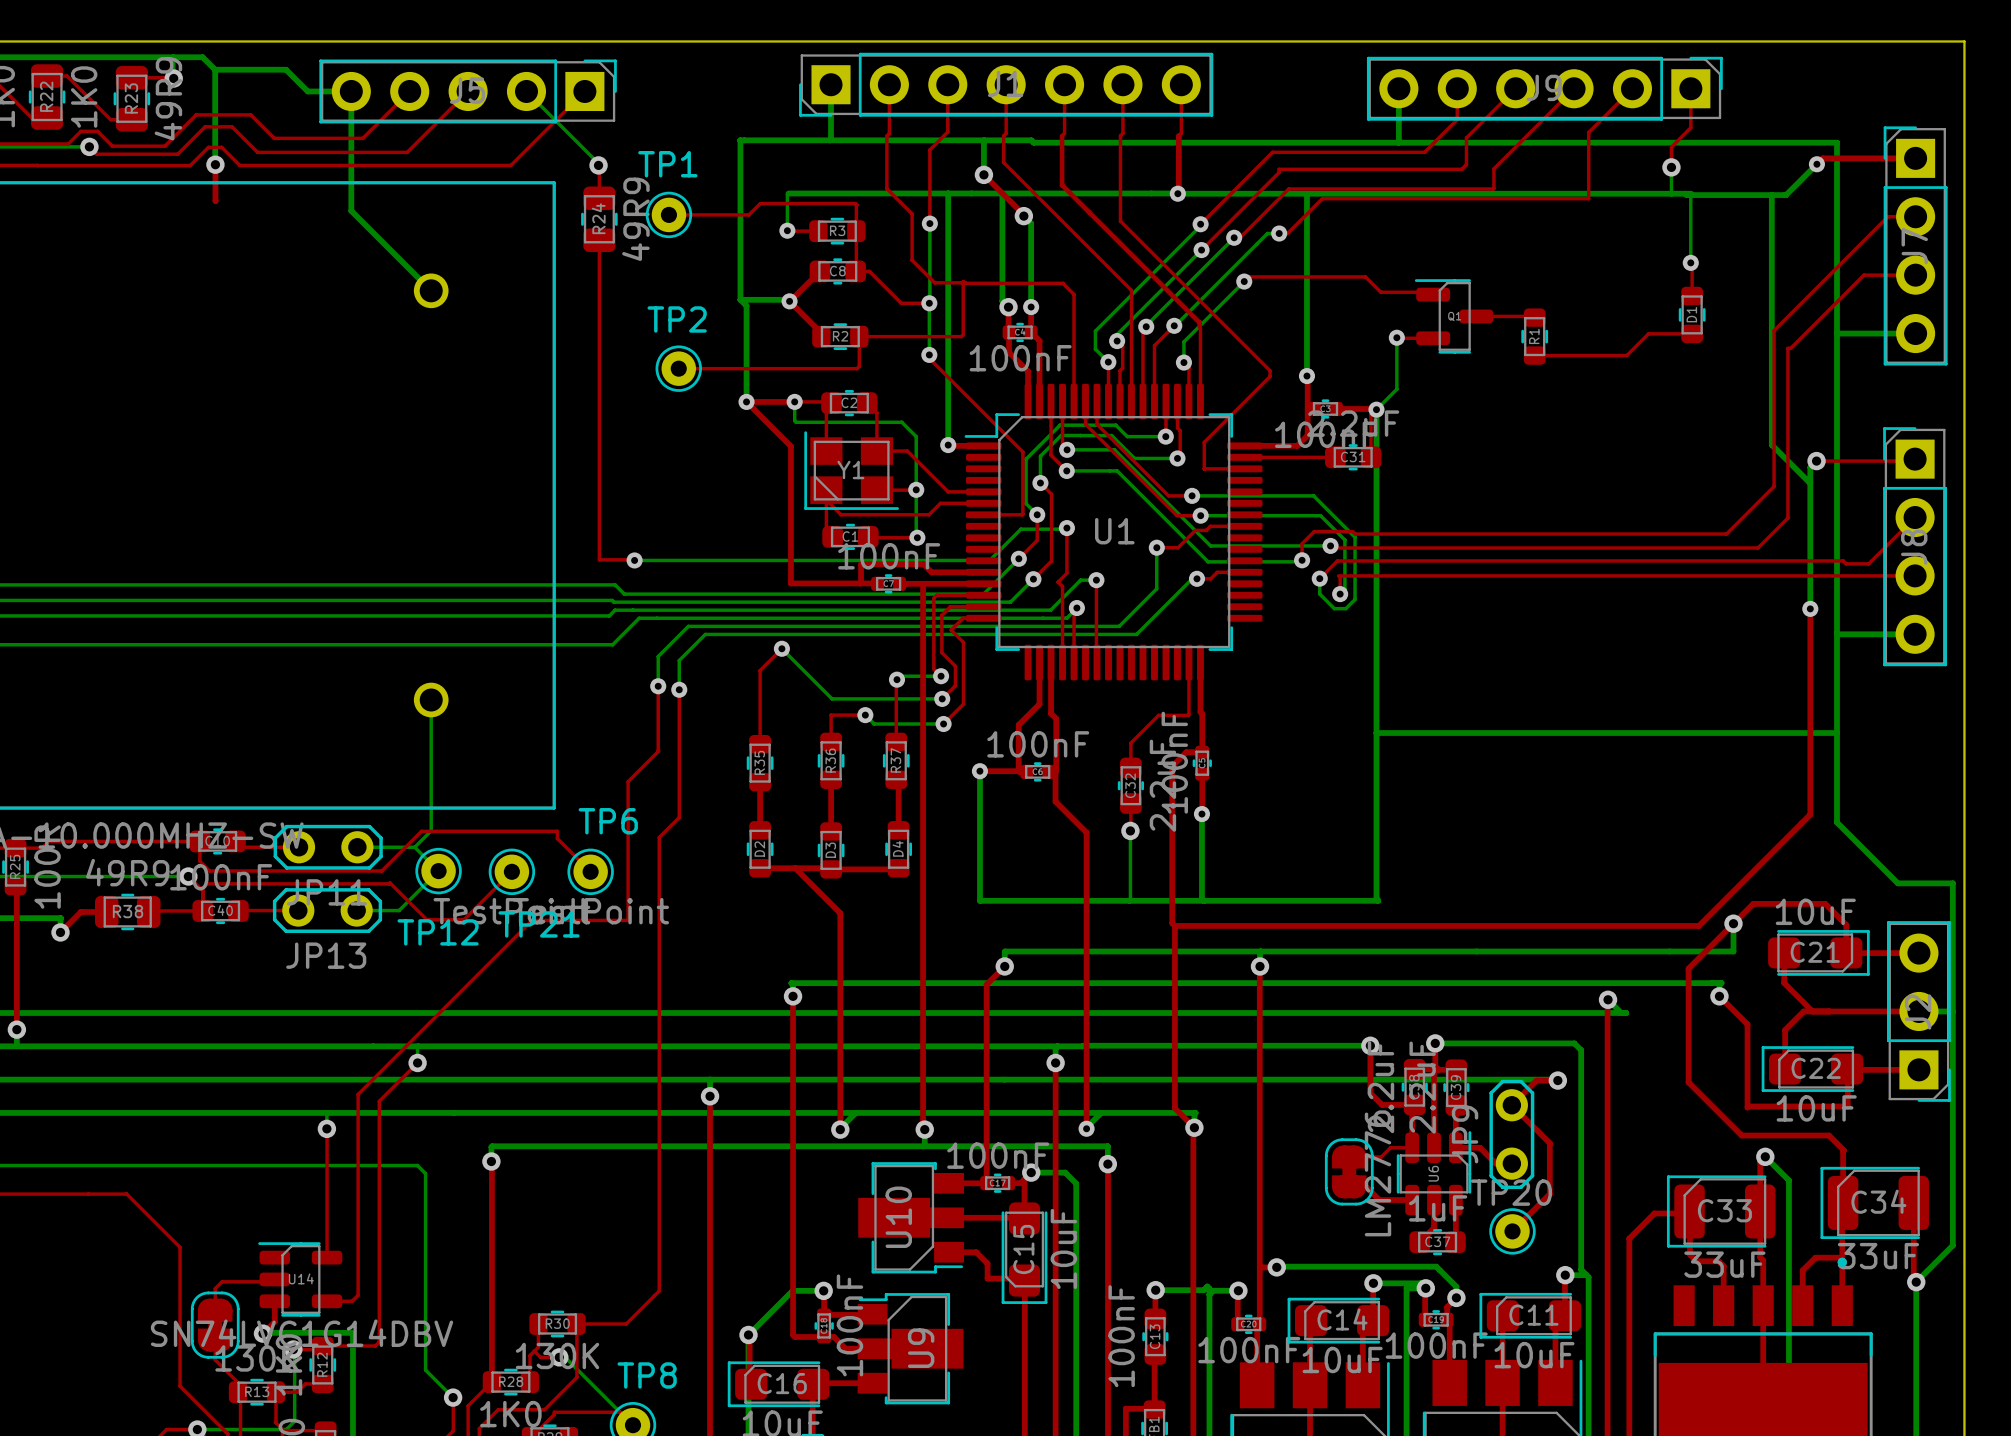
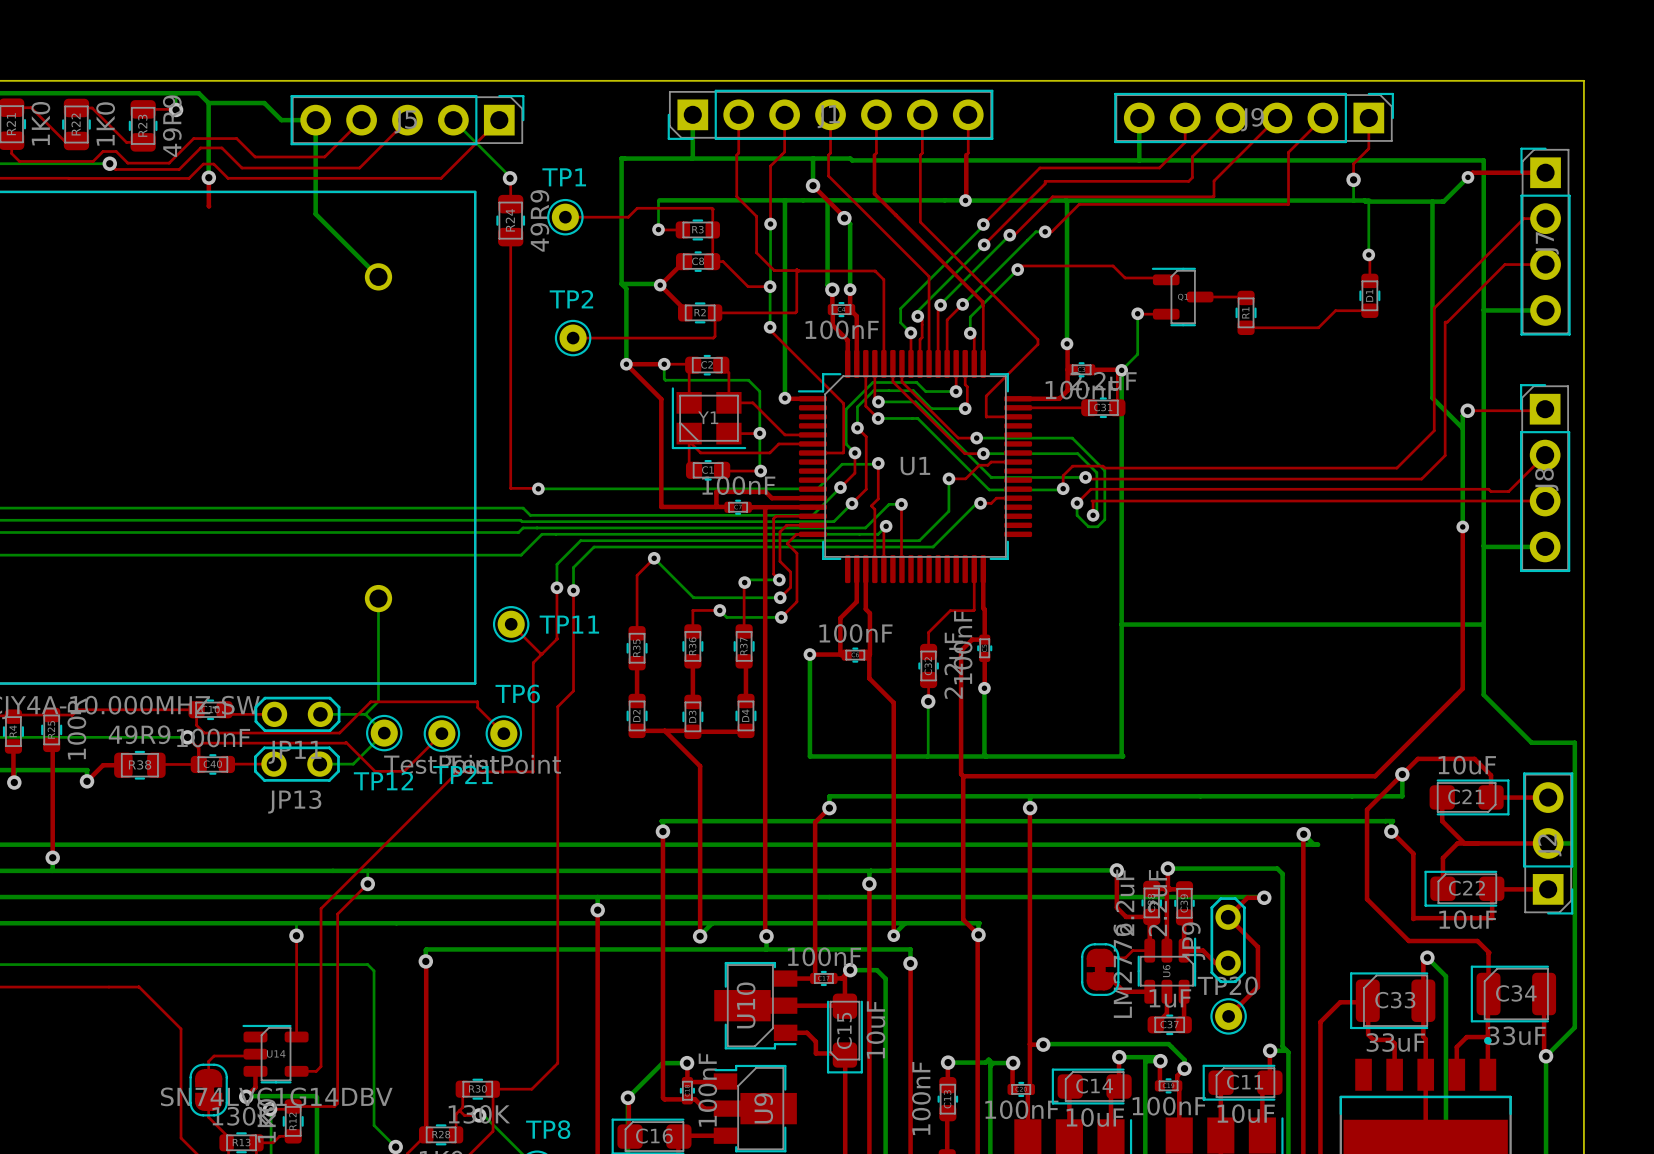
top track: none -> (511, 624) (542, 654)
TP11: none -> (511, 624)

